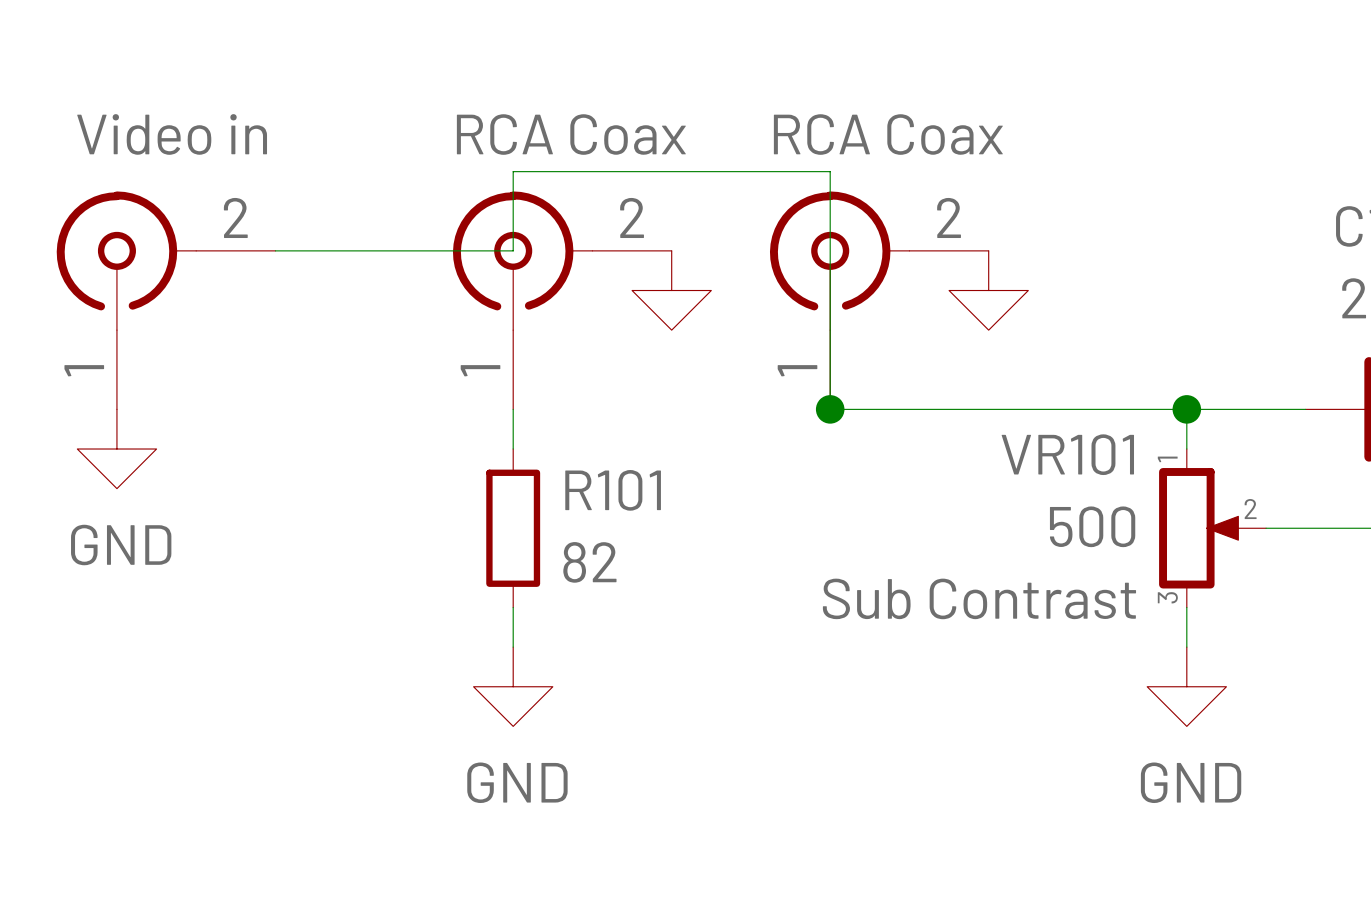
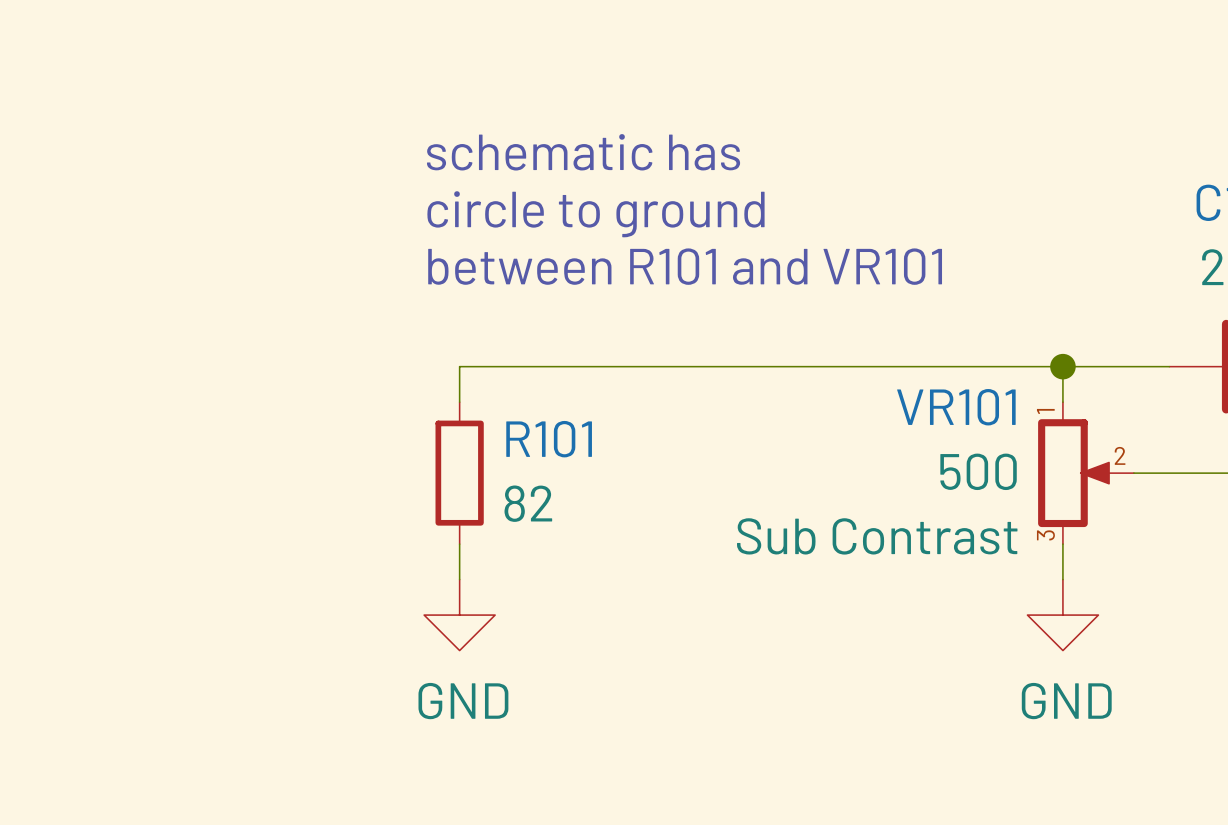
text: none -> schematic has (583, 152)
text: none -> circle to ground (595, 214)
wire: (275, 250) (513, 250) (513, 171) (830, 171) (830, 409) -> (459, 366) (743, 366)
power symbol: (671, 290) -> none
power symbol: (988, 290) -> none
text: none -> between R101 and VR101 (685, 266)
part: Video in (166, 300) -> none
part: RCA Coax (562, 300) -> none
part: RCA Coax (879, 300) -> none
junction: (830, 409) -> none
power symbol: GND (116, 449) -> none

